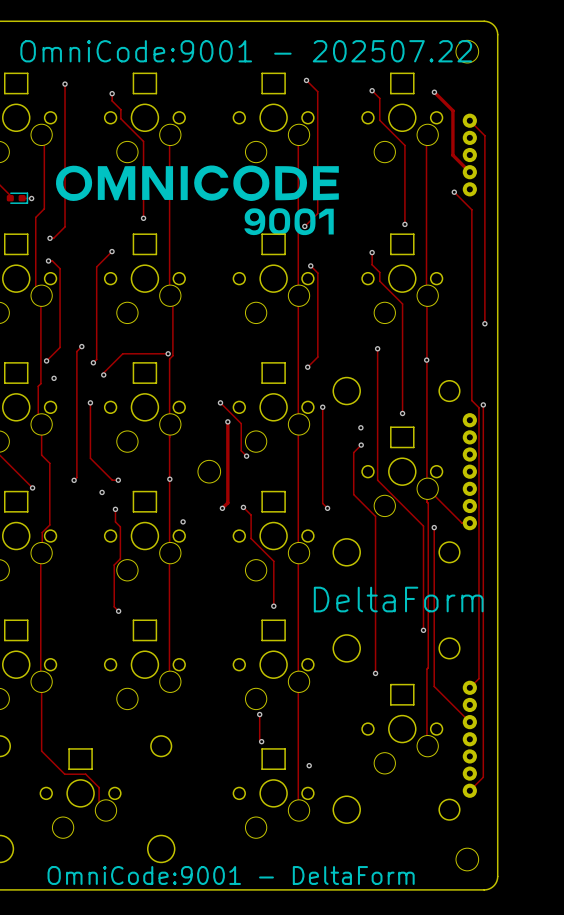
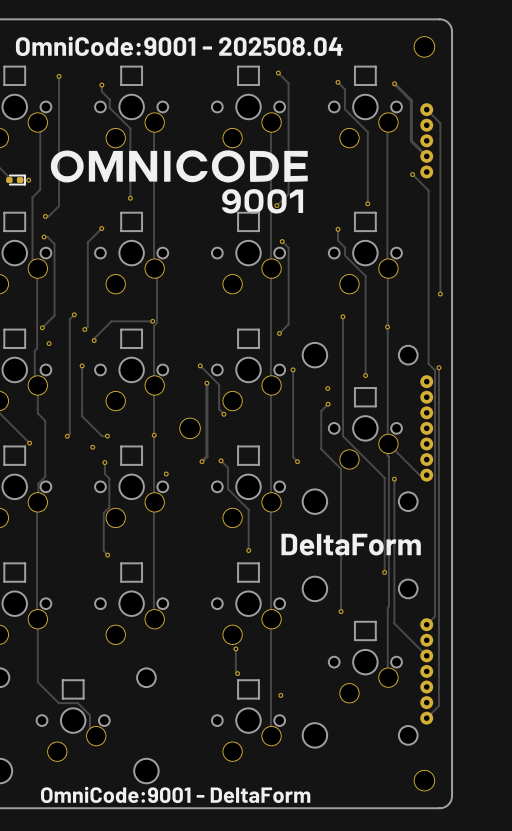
text: OmniCode:9001 - 202507.22 (246, 51) -> OmniCode:9001 - 202508.04 (179, 46)

